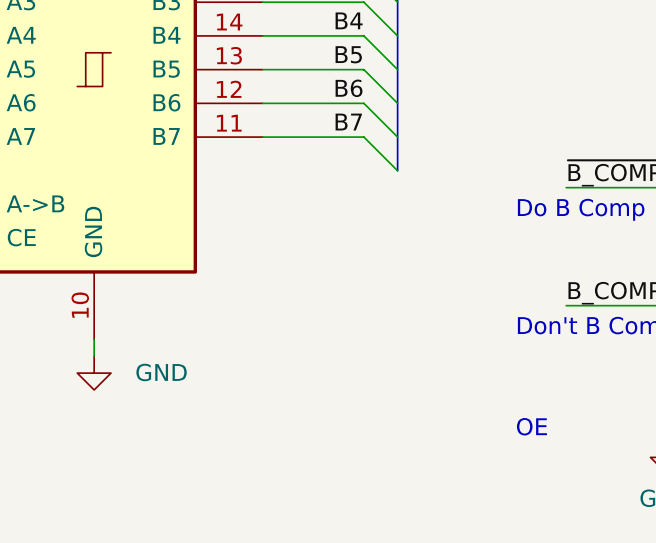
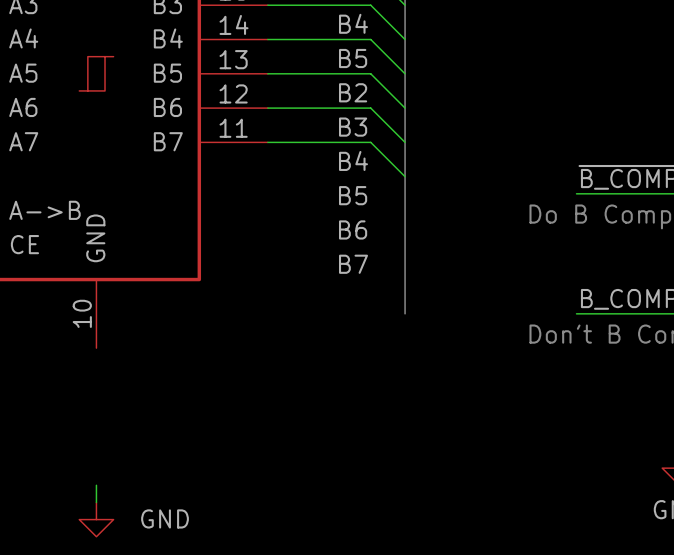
label: B6 (349, 88) -> B2 (353, 92)
label: B7 (348, 122) -> B3 (353, 127)
label: none -> B4 (353, 160)
bus: none -> (405, 176) (405, 313)
label: none -> B5 (353, 195)
label: none -> B6 (353, 229)
label: none -> B7 (353, 264)
wire: (94, 339) (94, 356) -> (96, 485) (96, 502)
power symbol position: GND (94, 373) -> GND (96, 519)
text: OE (531, 426) -> none

